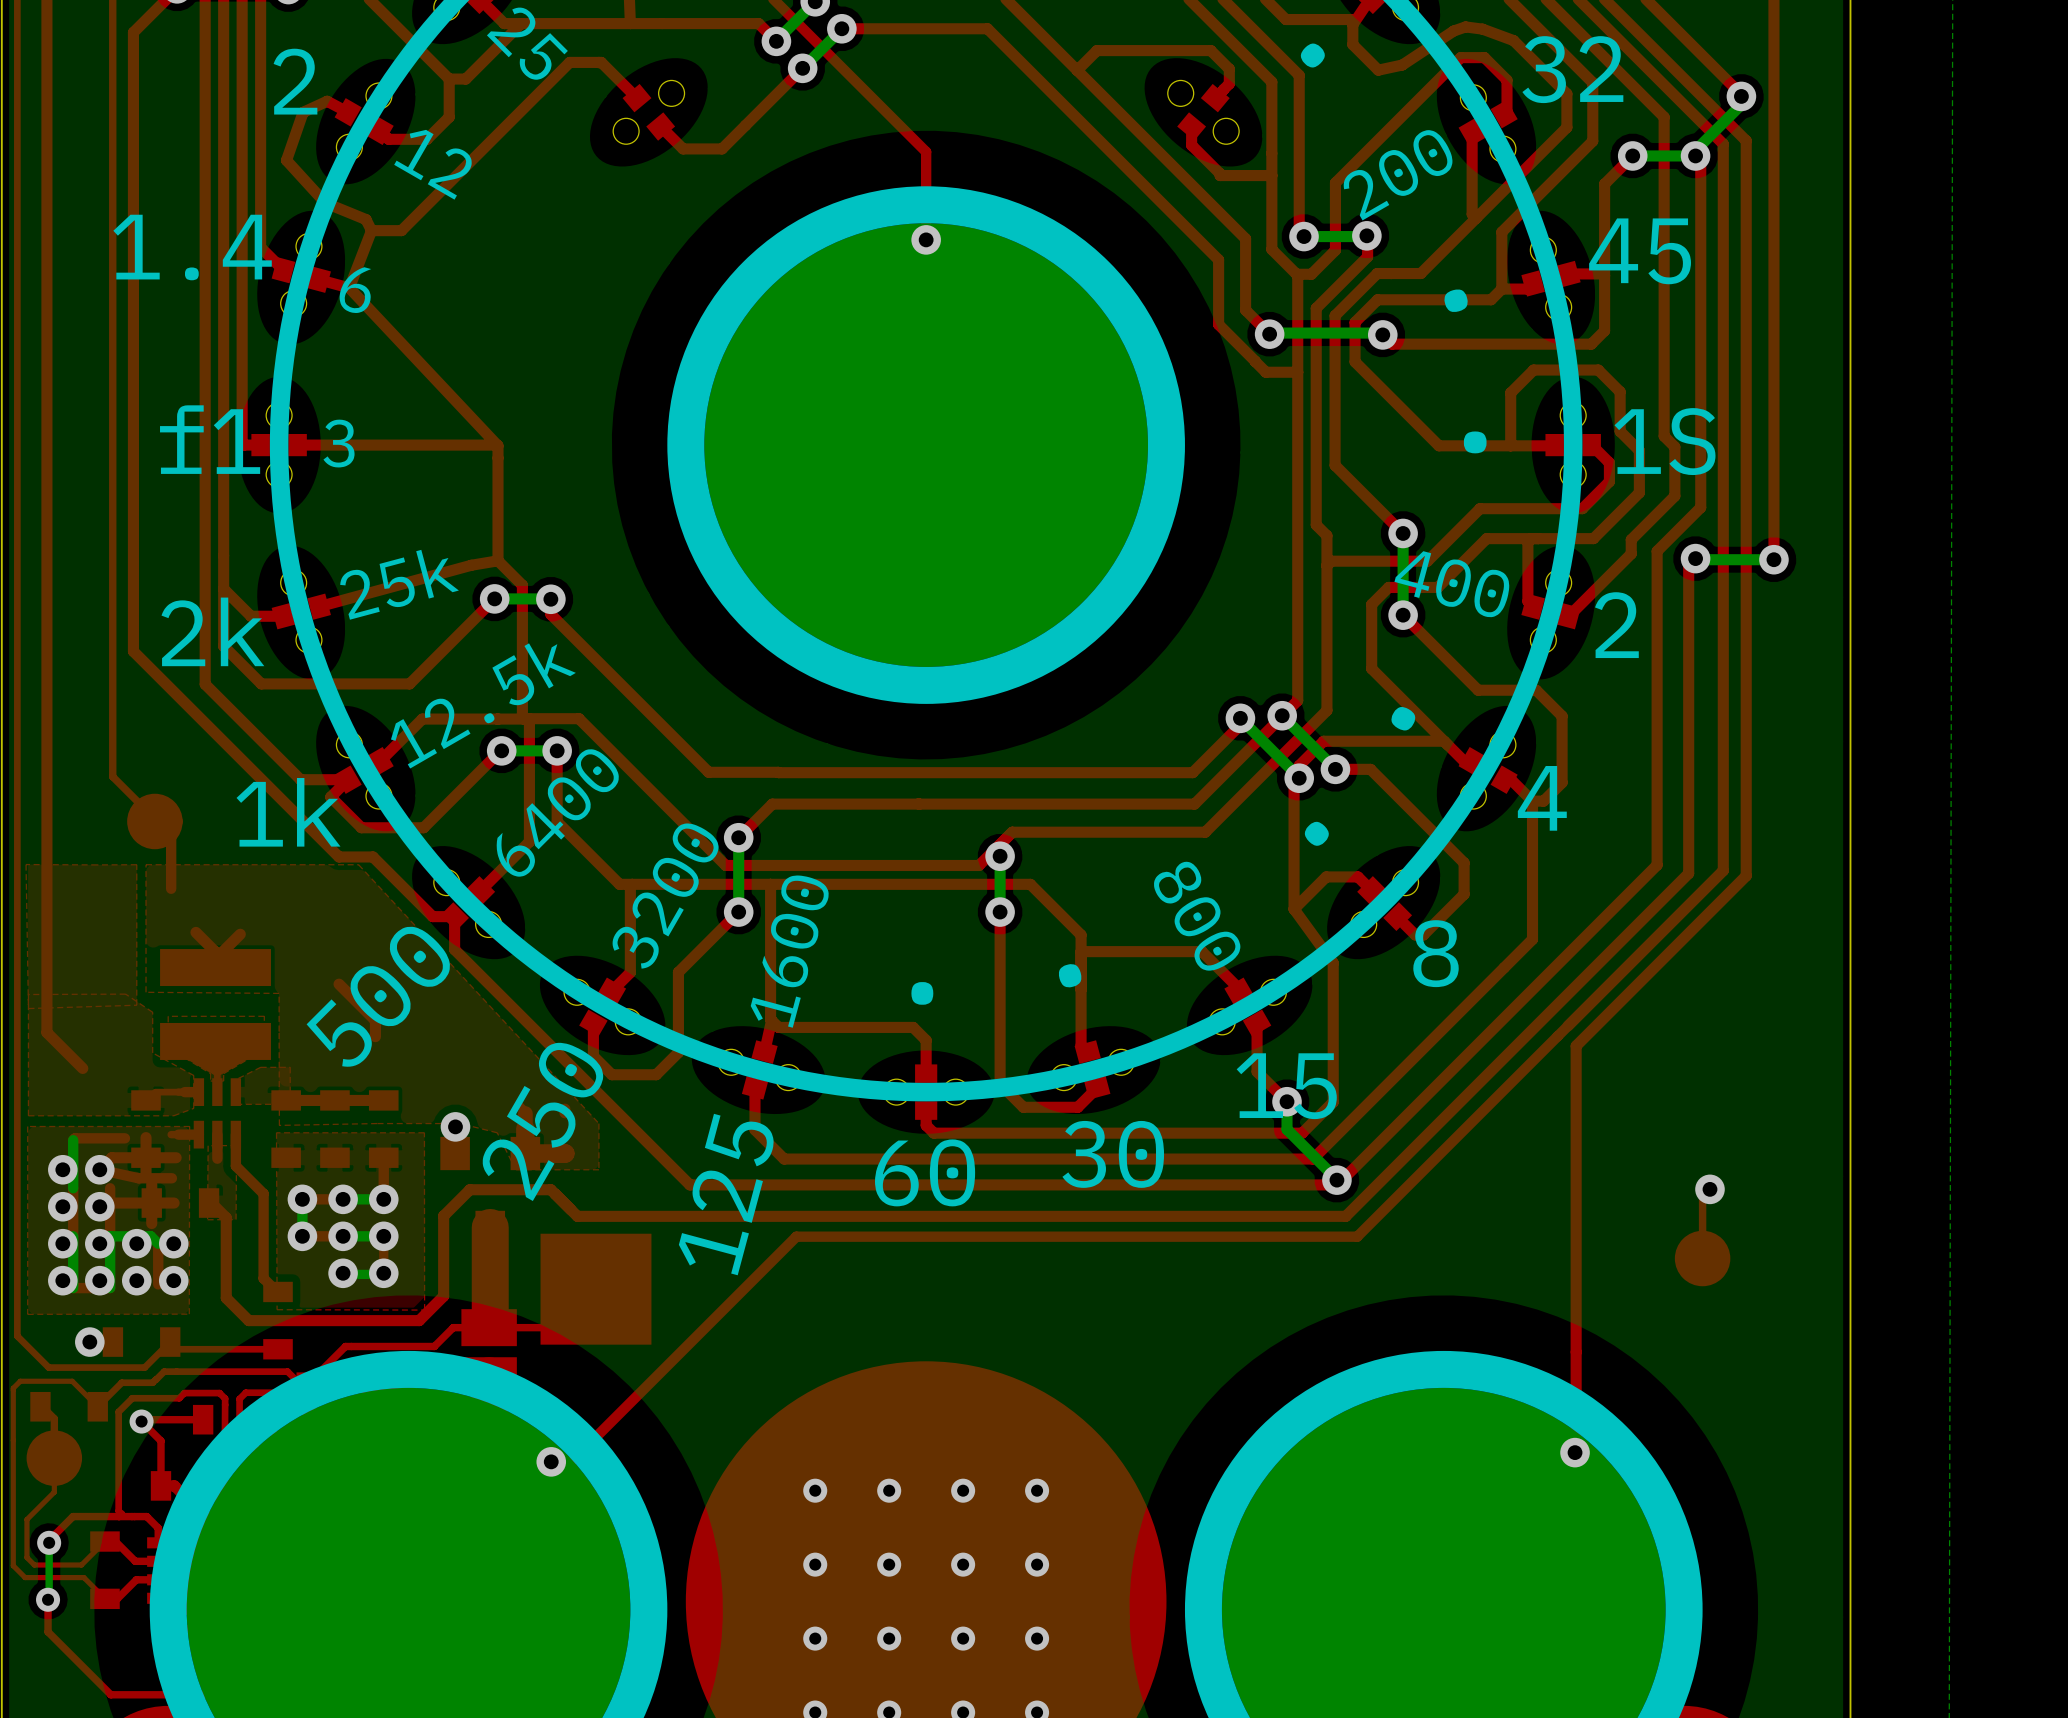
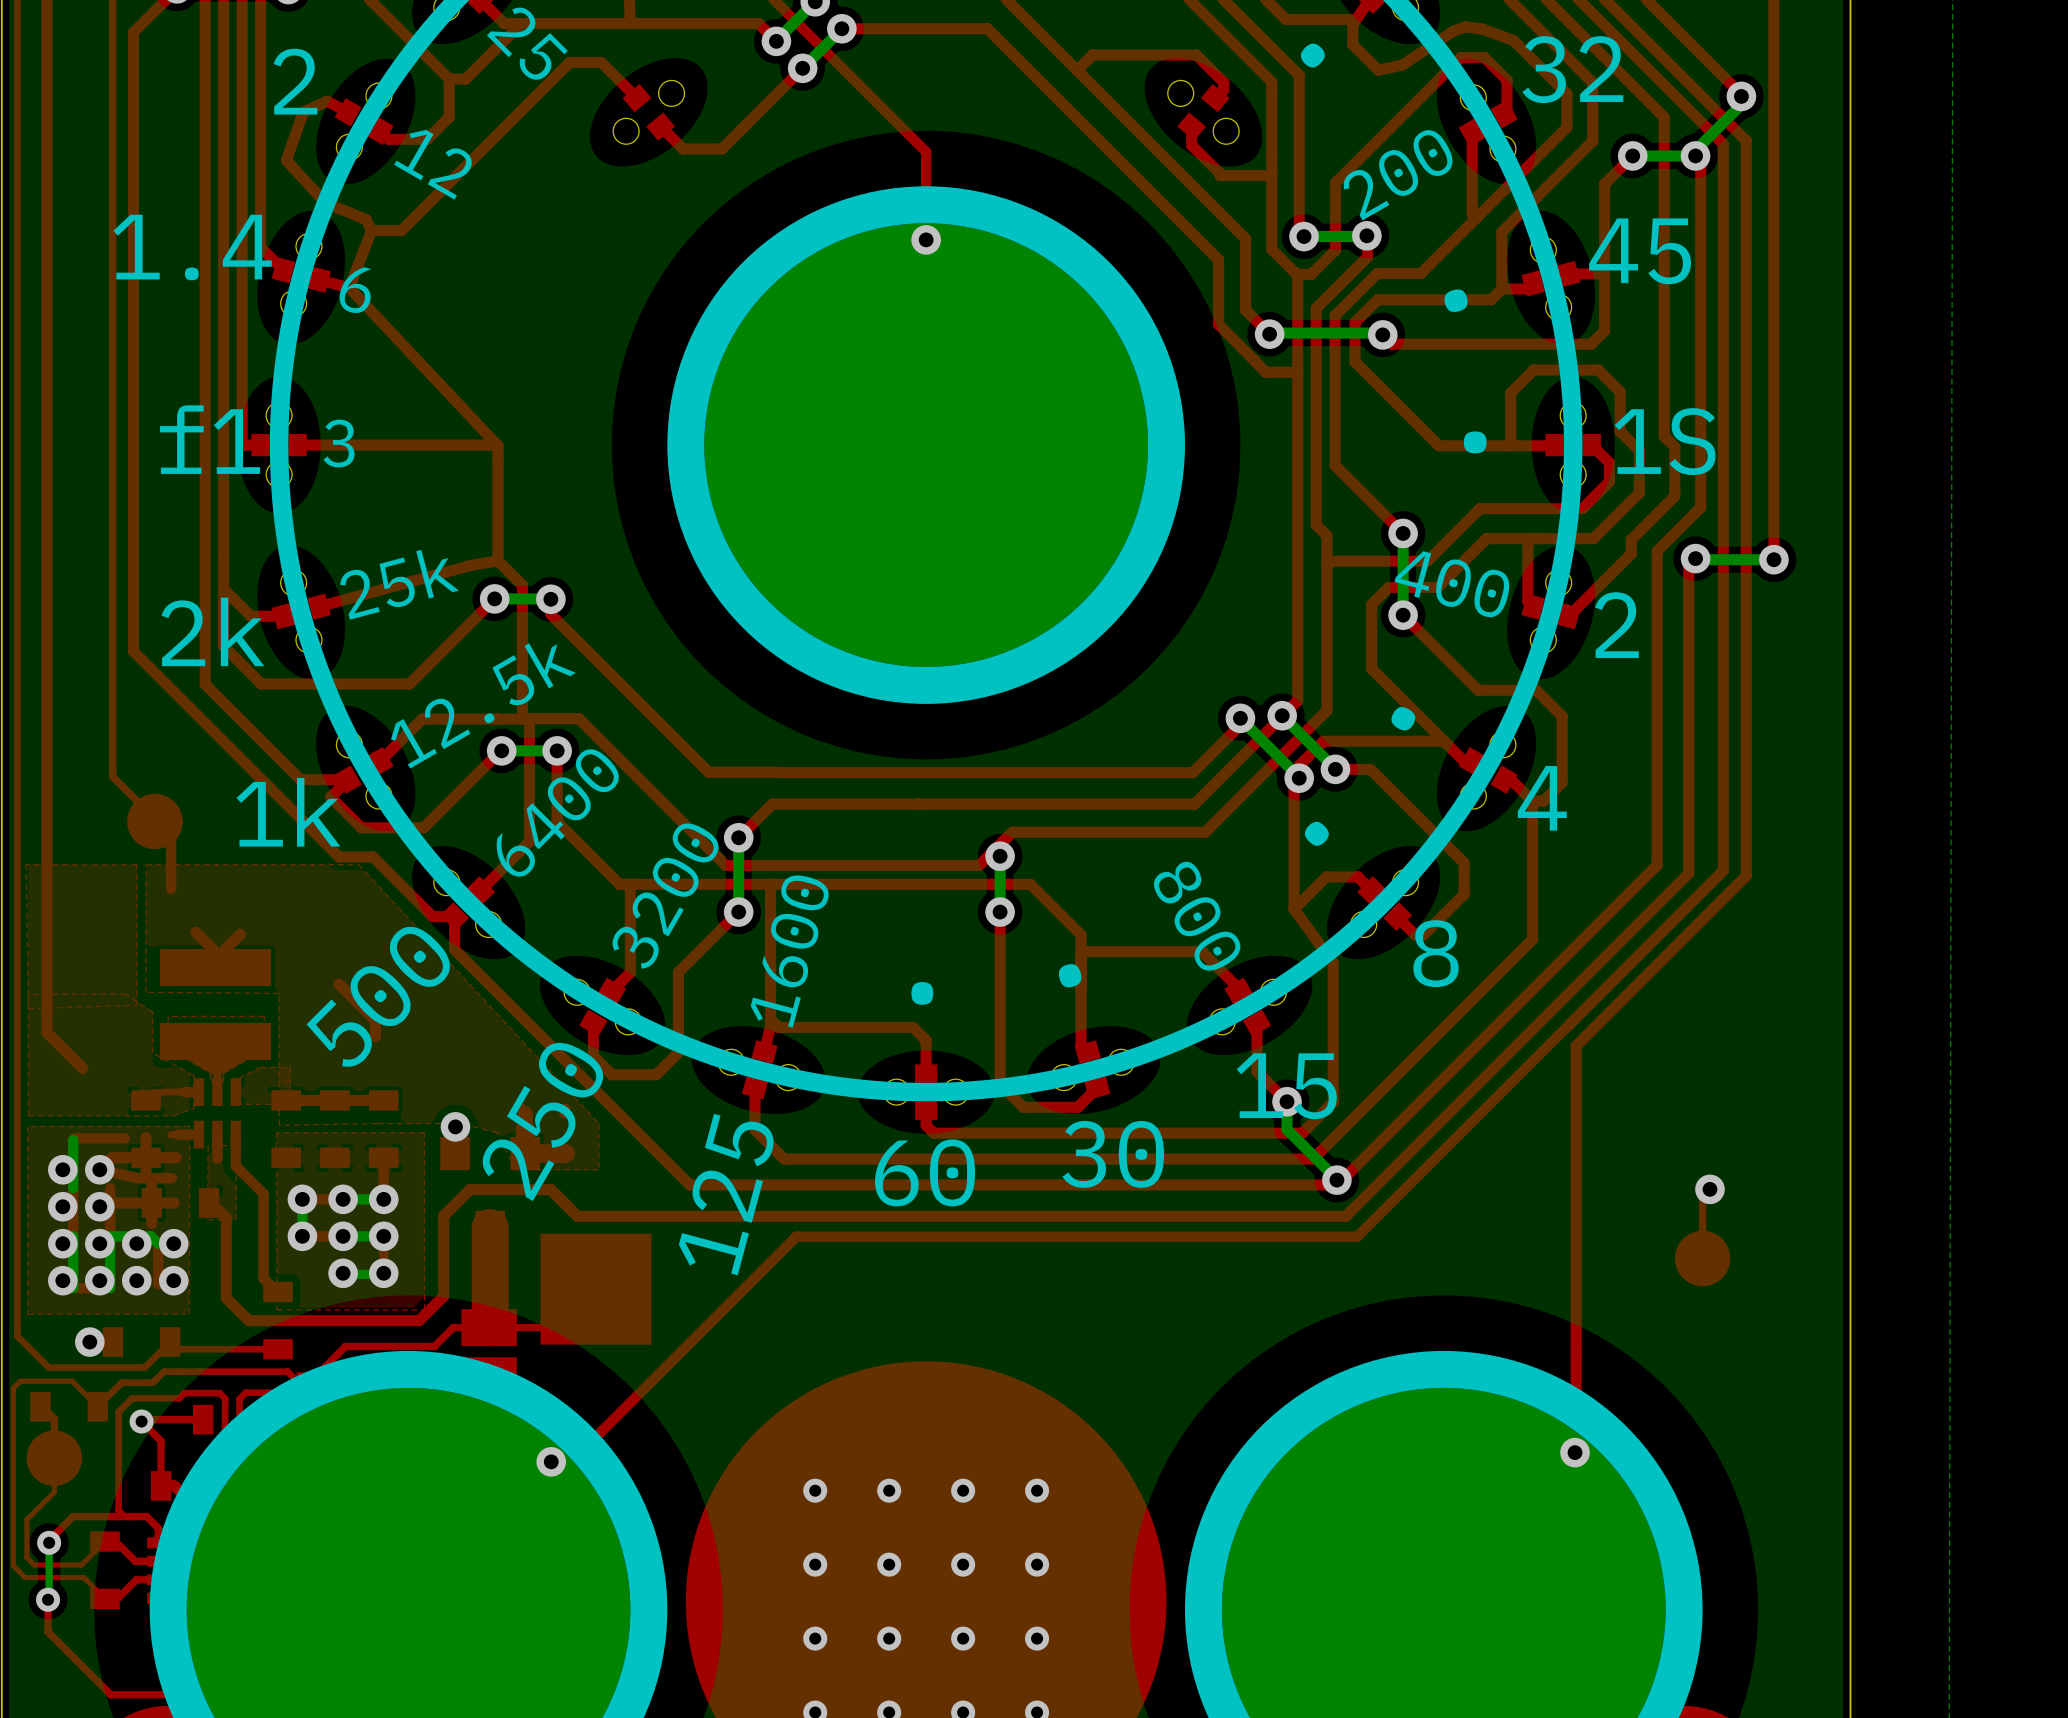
top track: (1092, 55) (1096, 50) (1210, 50) (1229, 69) (1229, 83) (1223, 89) -> (1092, 55) (1196, 55) (1223, 82) (1223, 89)

